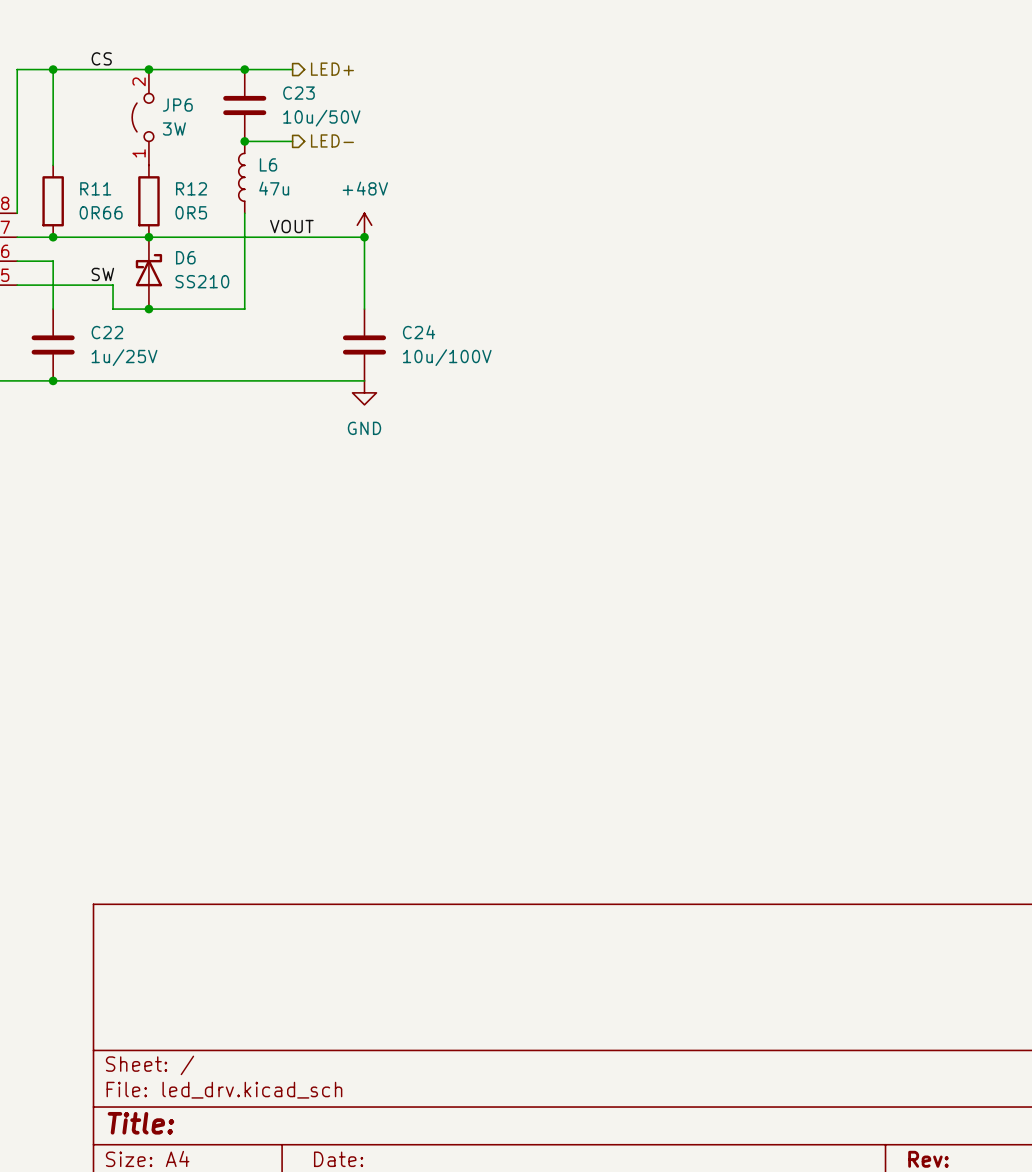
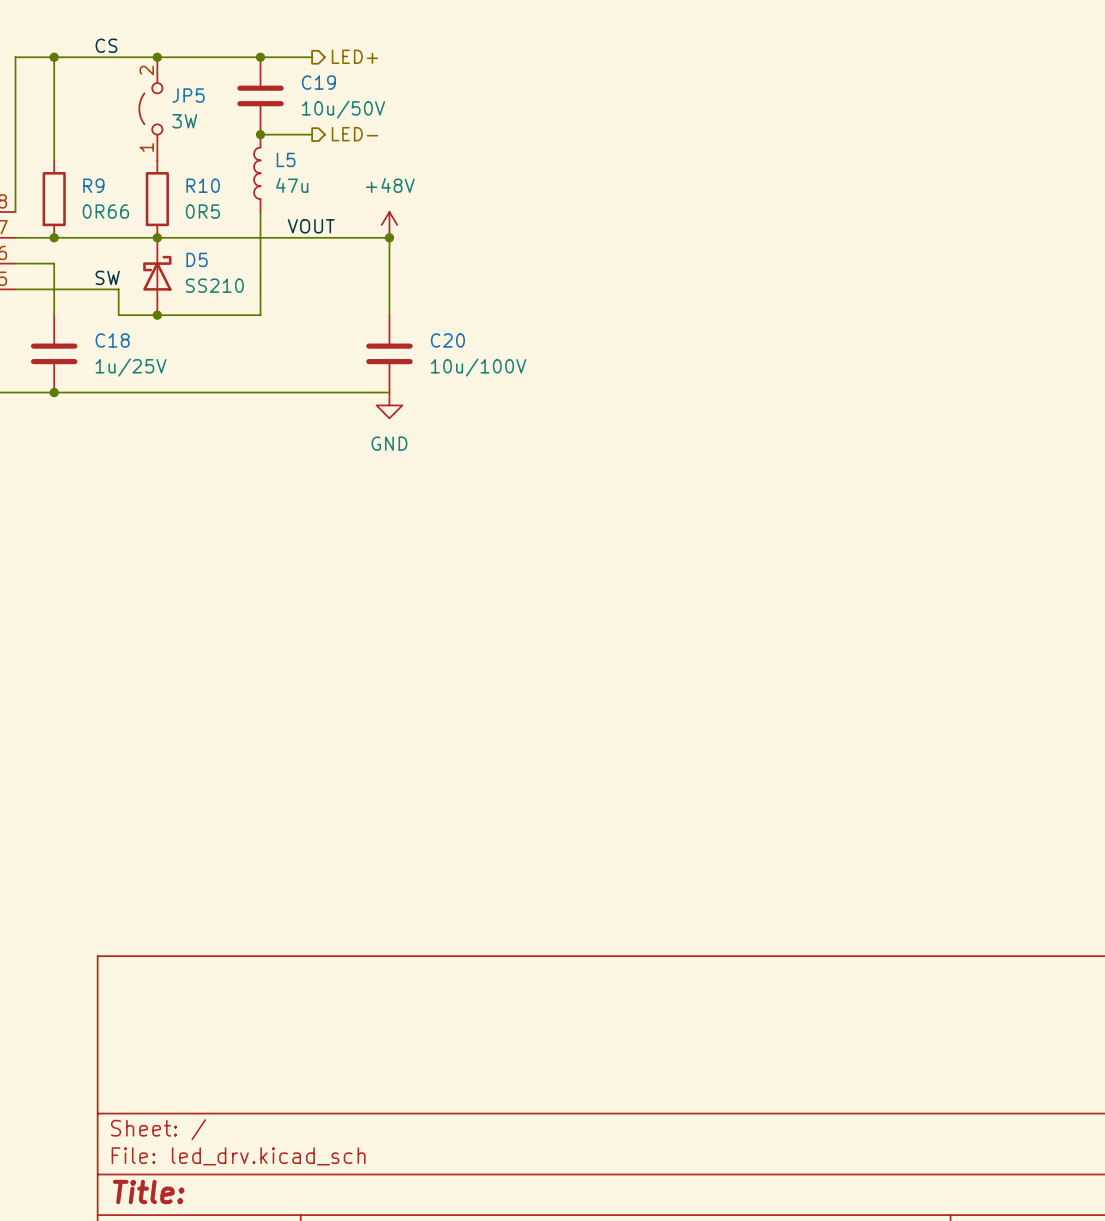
C23 name: C23 (299, 93) -> C19 (318, 82)
JP6 name: JP6 (177, 105) -> JP5 (188, 95)
L6 name: L6 (268, 164) -> L5 (286, 159)
R11 name: R11 (95, 188) -> R9 (93, 185)
R12 name: R12 (191, 188) -> R10 (203, 185)
D6 name: D6 (185, 257) -> D5 (197, 259)
C22 name: C22 (107, 332) -> C18 (112, 340)
C24 name: C24 (419, 332) -> C20 (447, 340)

